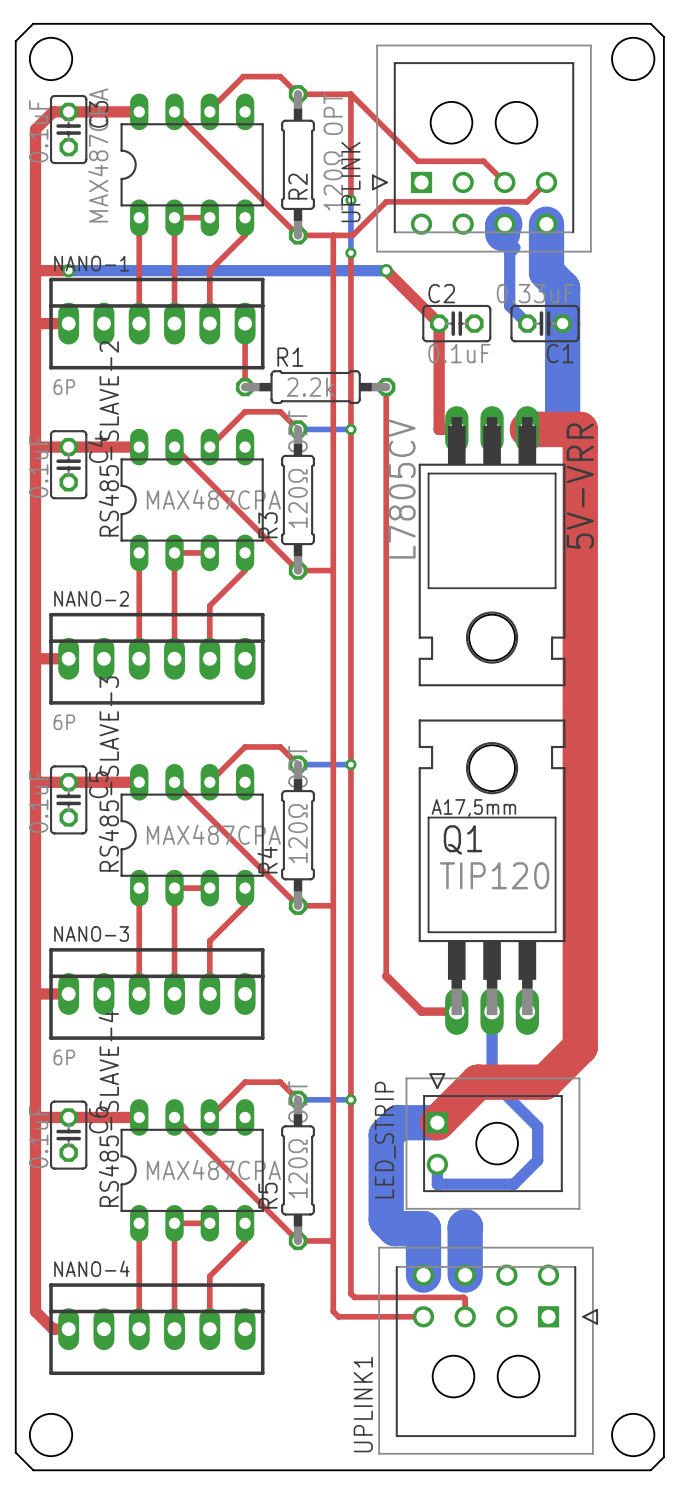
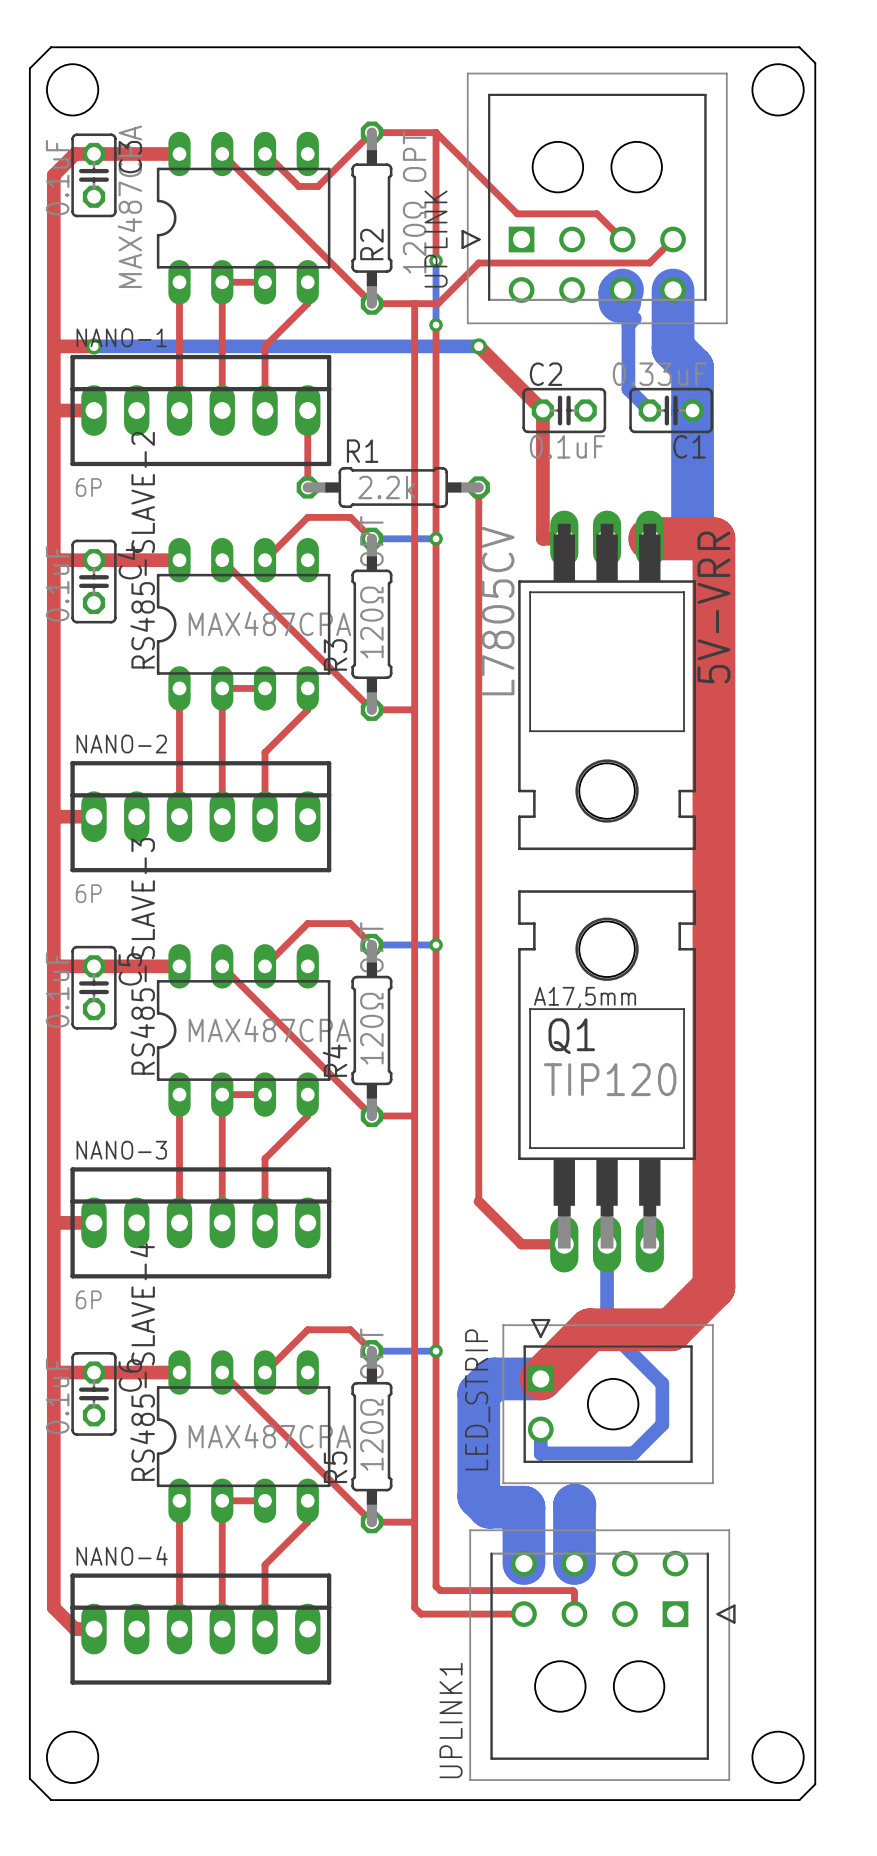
top track: (298, 94) (280, 76) (243, 76) (209, 111) -> (371, 132) (318, 186) (298, 186) (265, 153)

